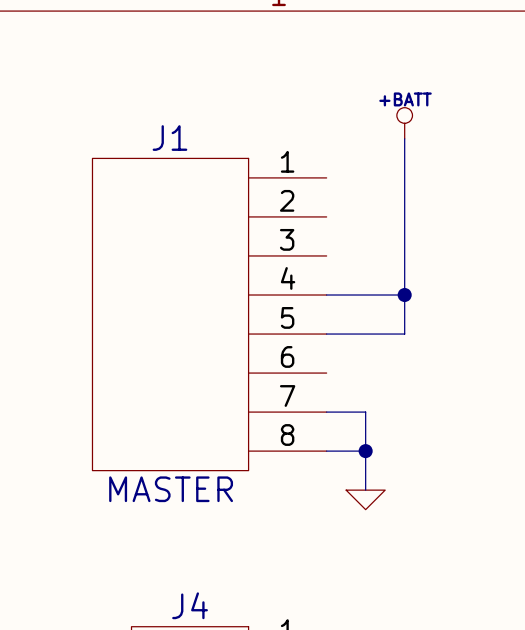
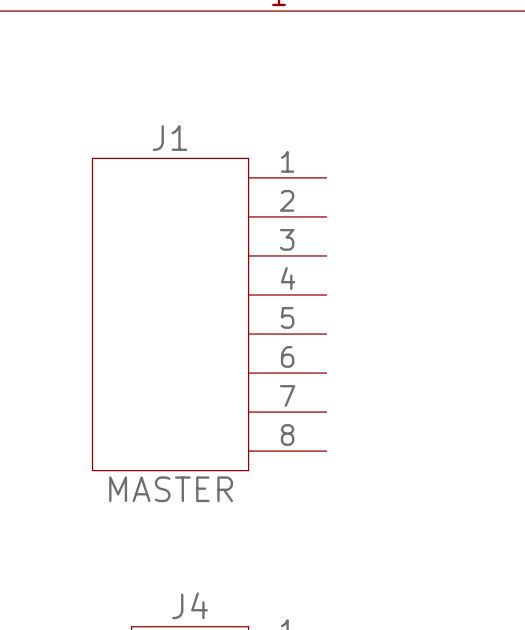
power symbol: +BATT (404, 123) -> none
wire: (404, 138) (404, 334) (326, 334) -> none
wire: (326, 295) (404, 295) -> none
junction: (404, 295) -> none
wire: (326, 412) (365, 412) (365, 490) -> none
wire: (326, 451) (365, 451) -> none
junction: (365, 451) -> none
power symbol: (365, 499) -> none

